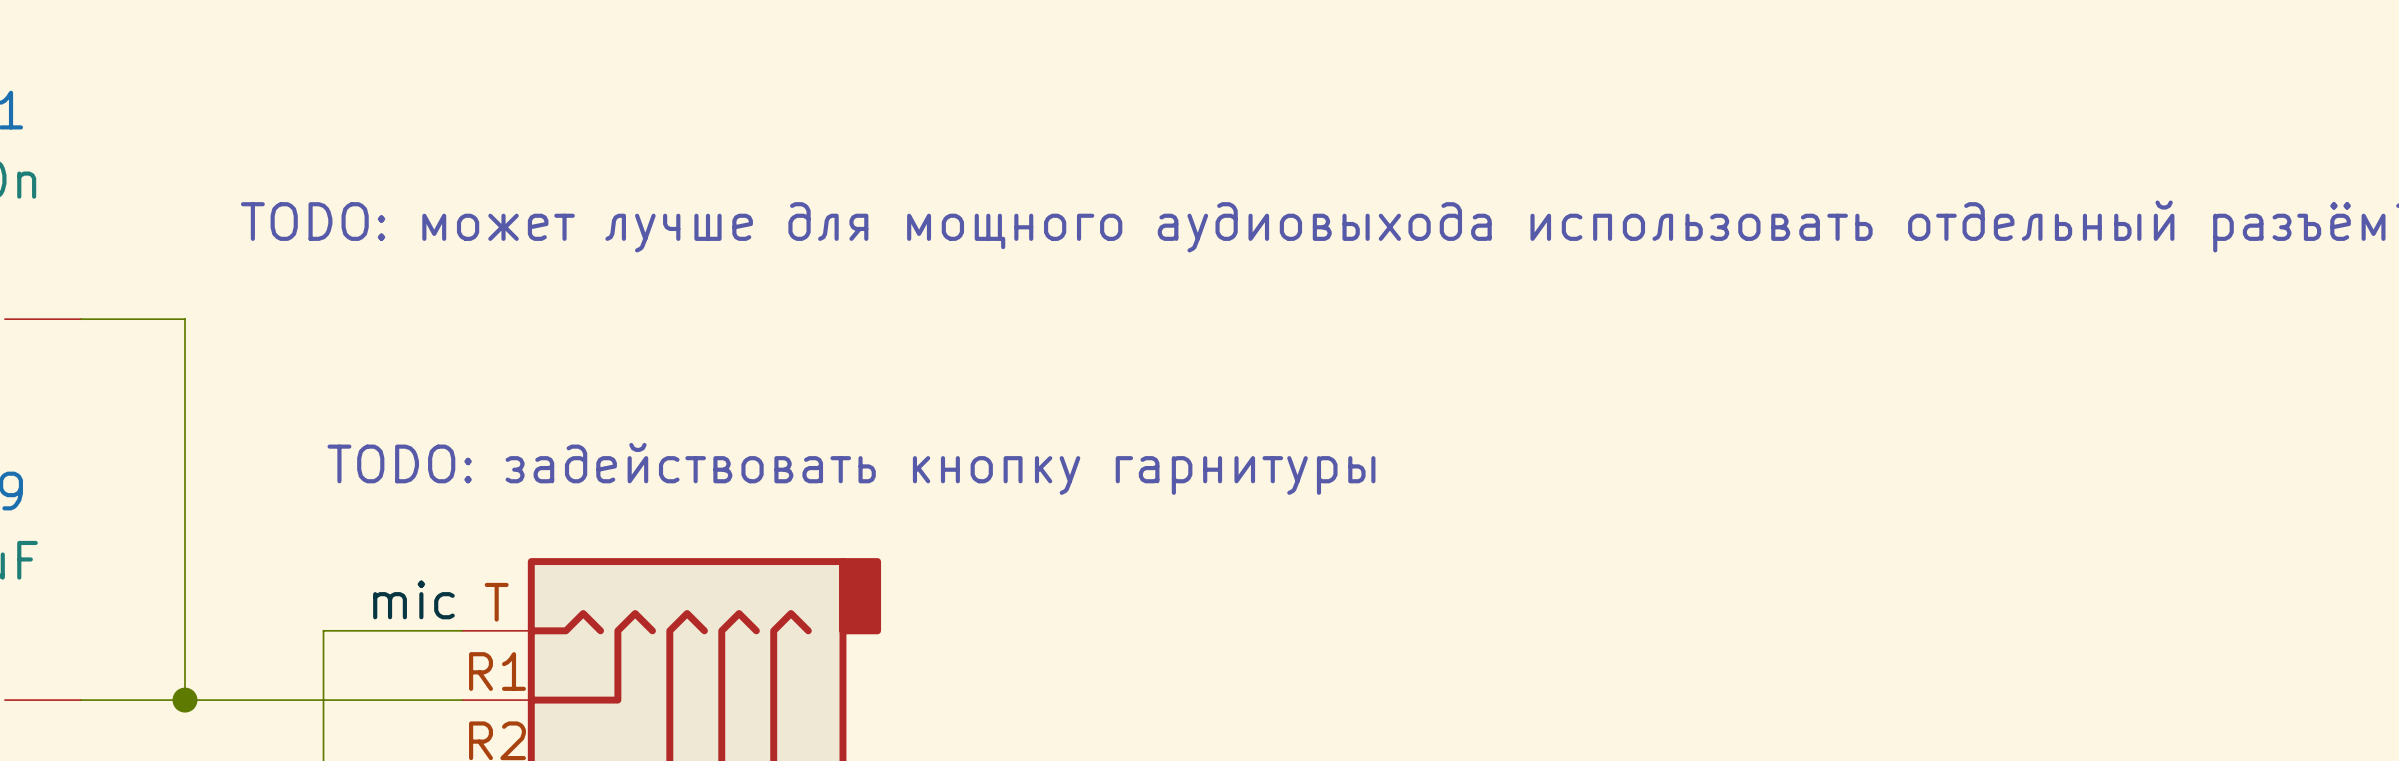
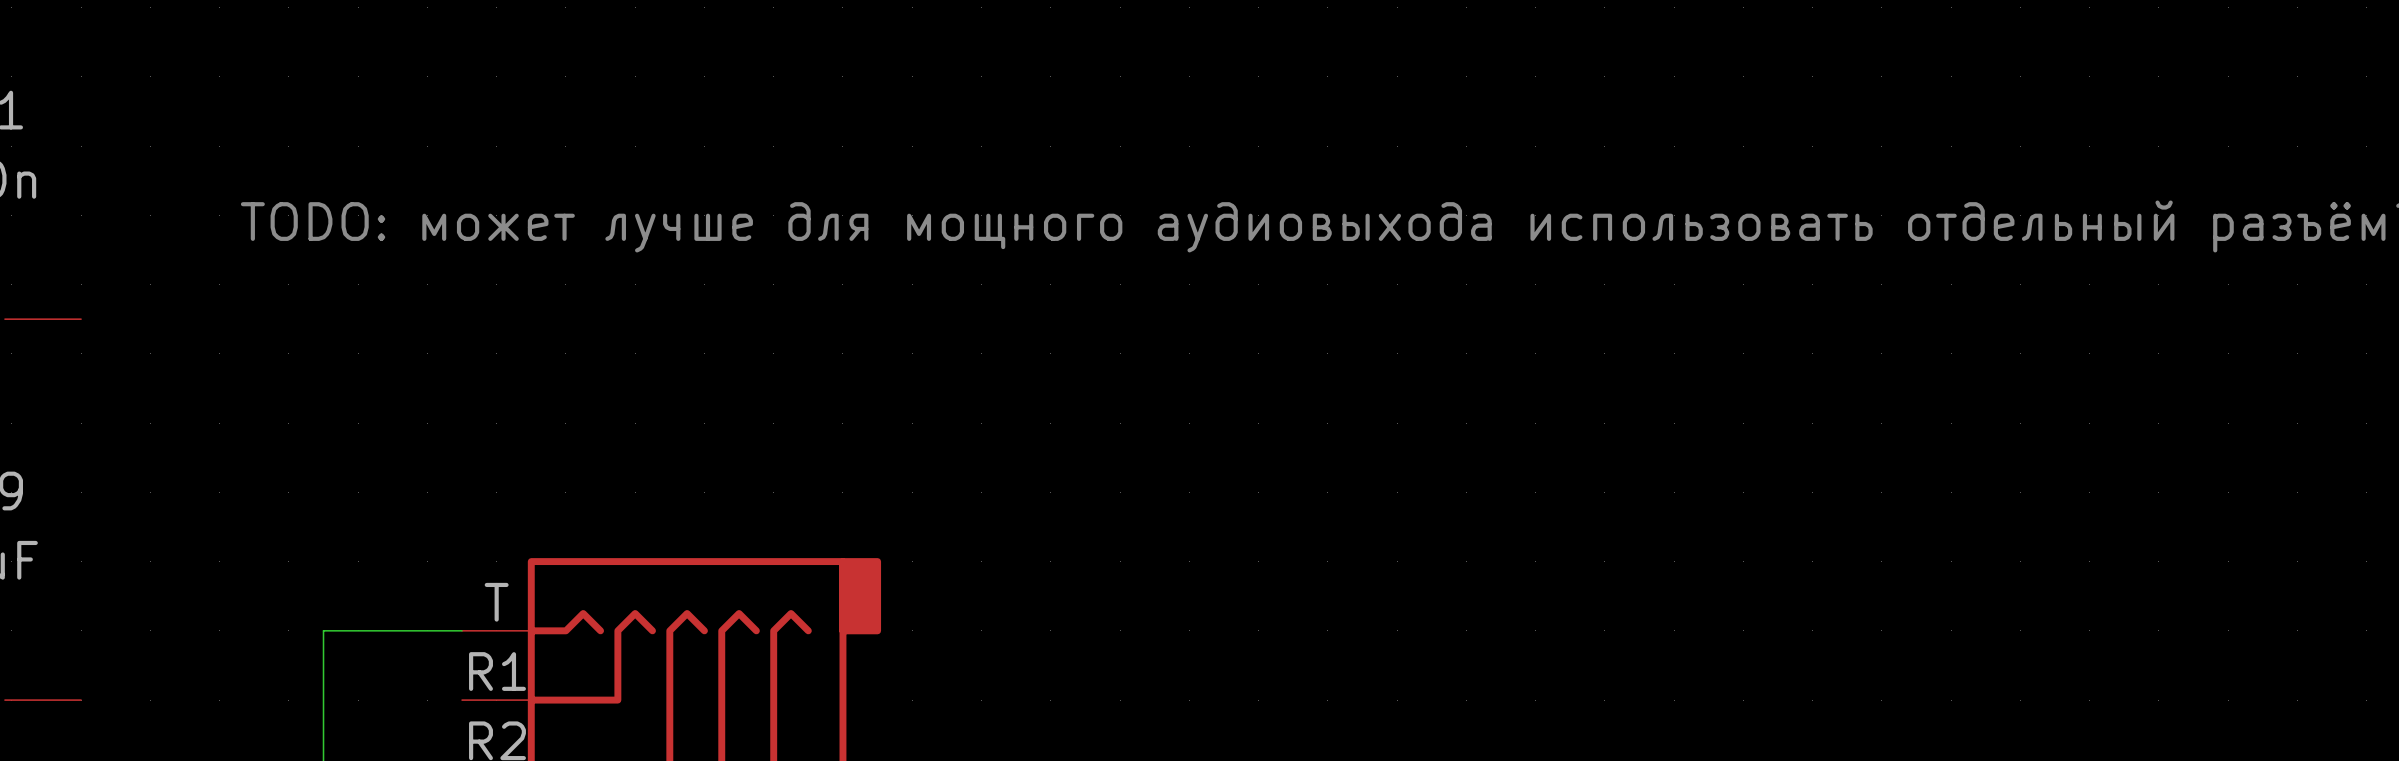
wire: (81, 319) (184, 319) (184, 700) -> none
text: TODO: задействовать кнопку гарнитуры (851, 468) -> none
label: mic (413, 599) -> none
wire: (81, 700) (462, 700) -> none
junction: (184, 700) -> none

